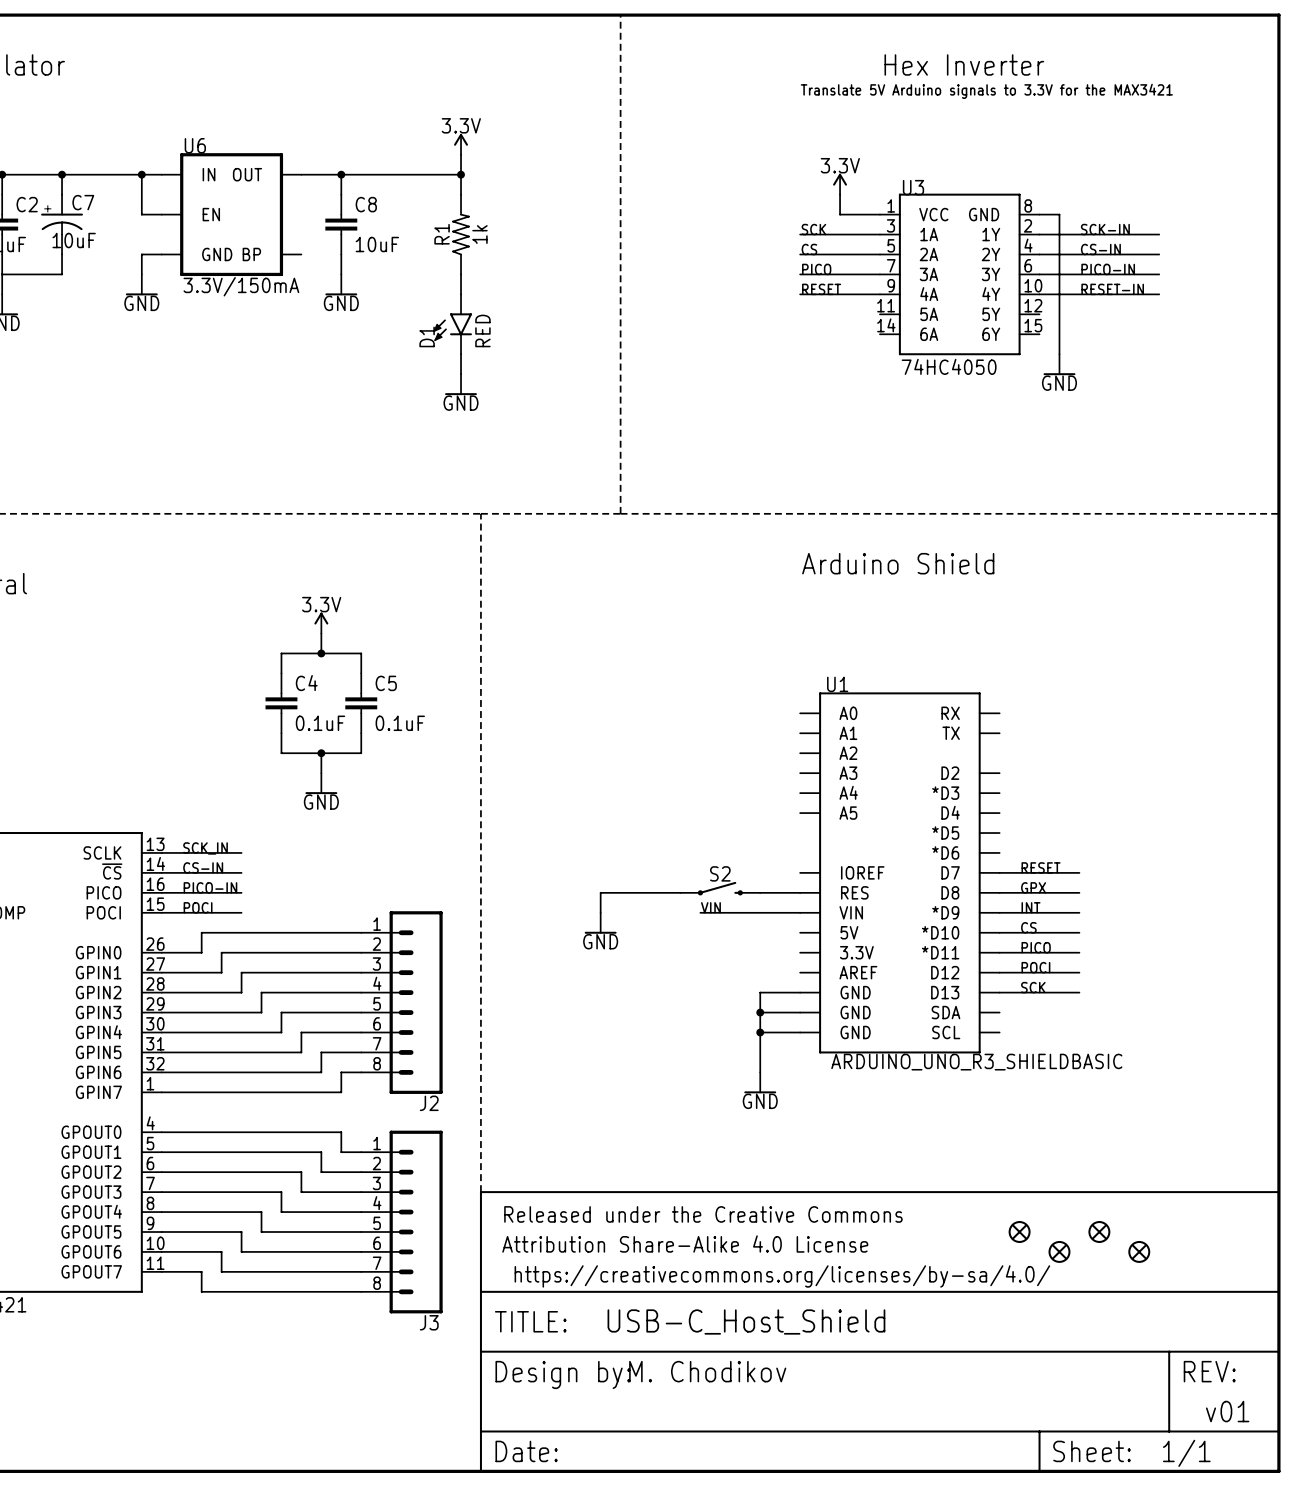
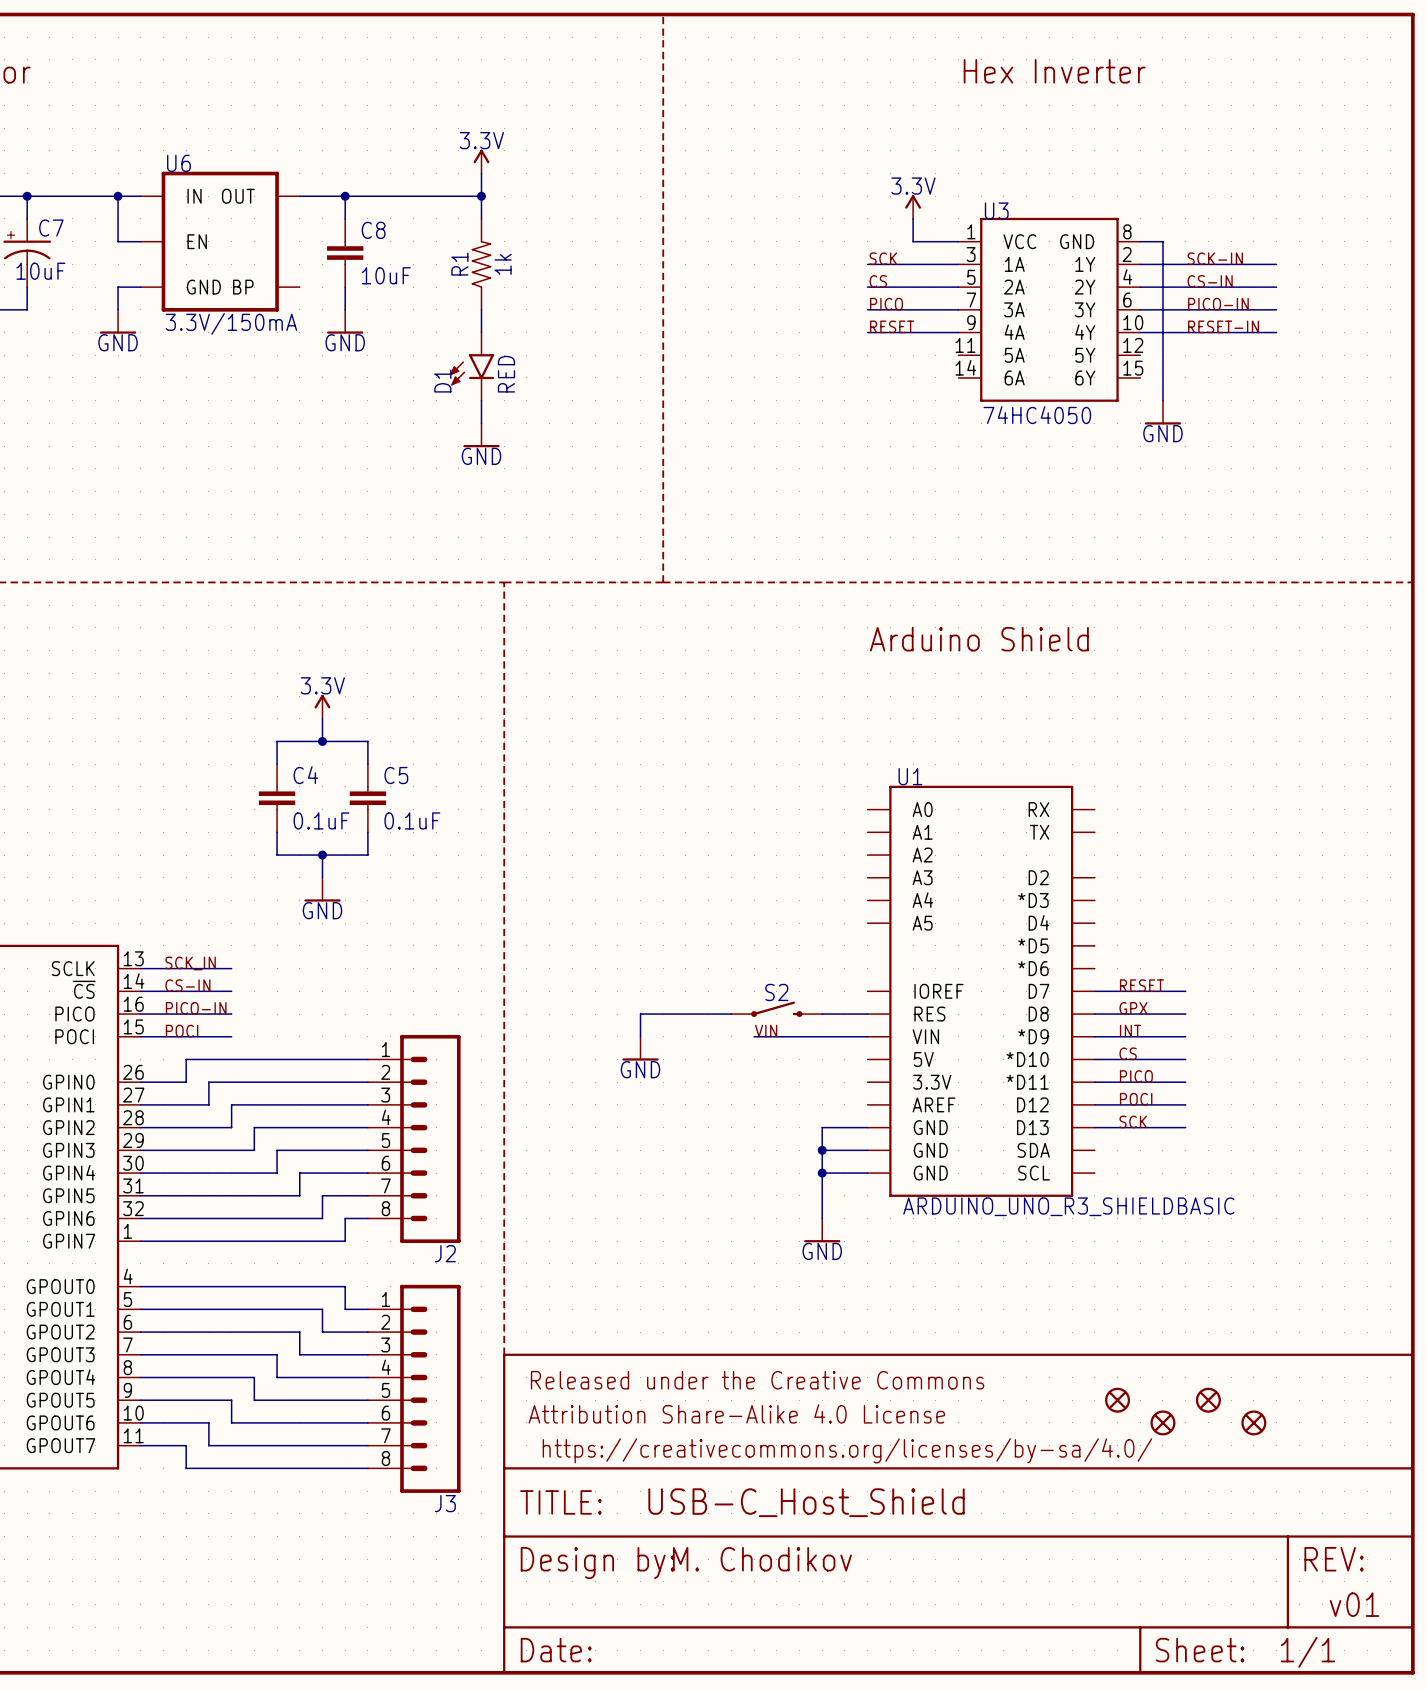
text: Translate 5V Arduino signals to 3.3V for the MAX3421 (986, 91) -> none

